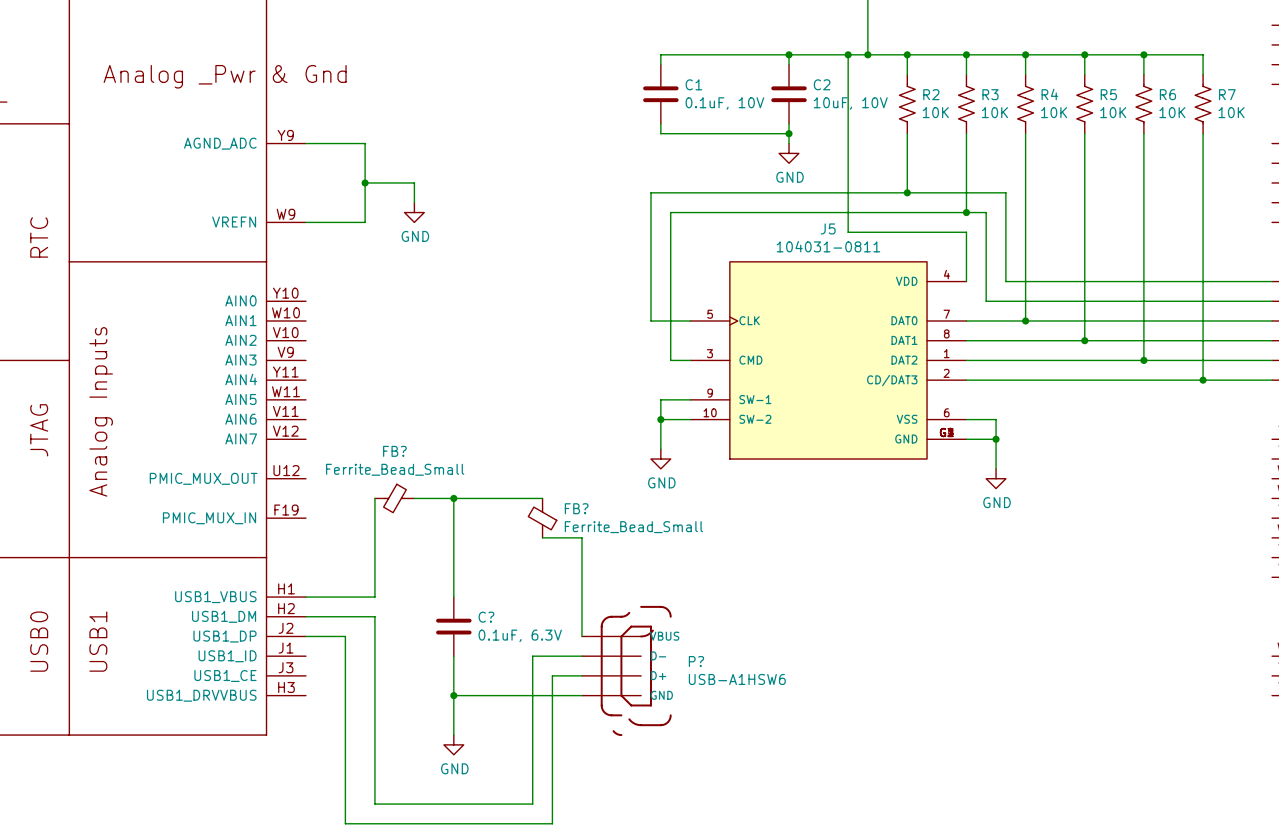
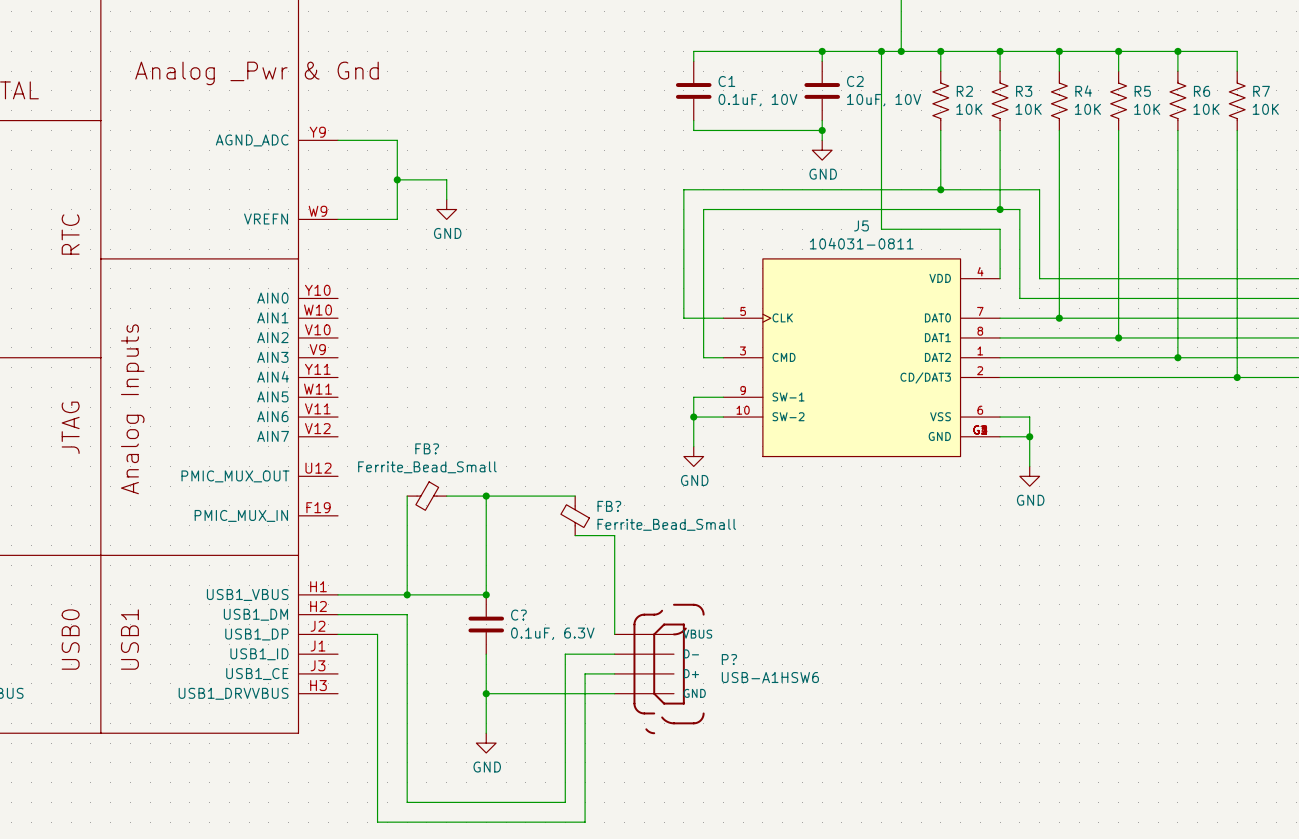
wire: none -> (407, 594) (486, 594)
junction: none -> (407, 594)
junction: none -> (486, 594)

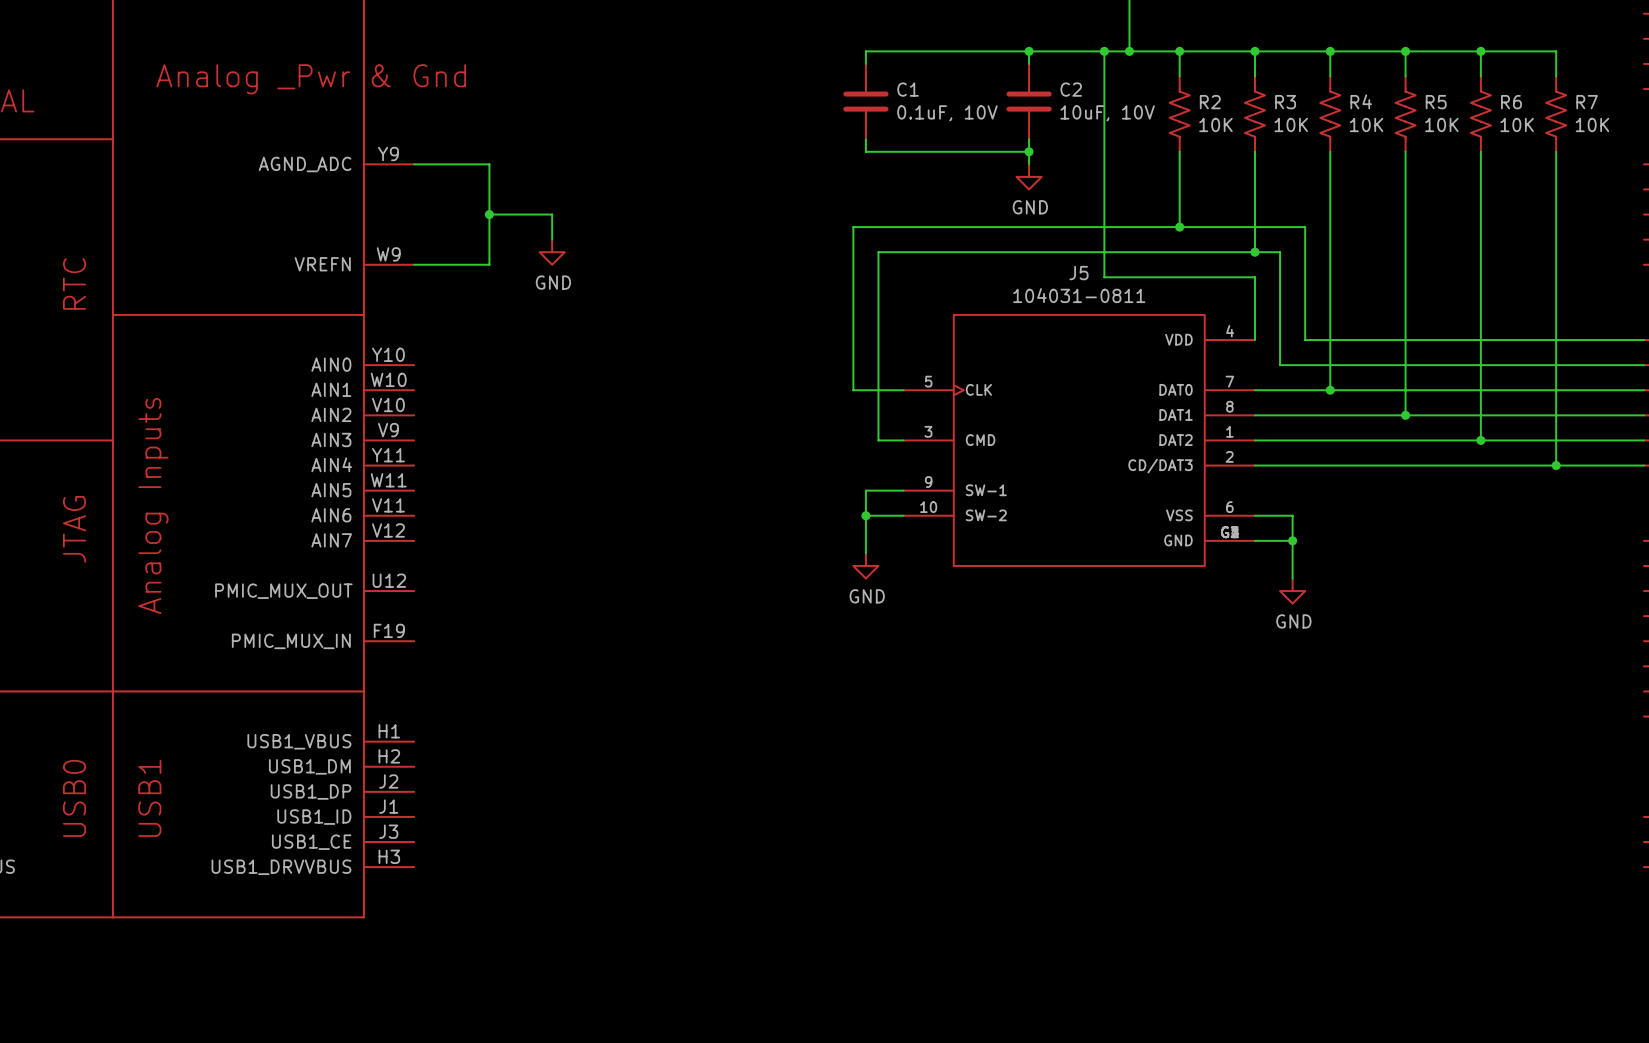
wire: (407, 496) (407, 594) -> none
FB?: Ferrite_Bead_Small (426, 496) -> none
wire: (446, 496) (575, 496) -> none
wire: (486, 496) (486, 594) (338, 594) -> none
junction: (486, 496) -> none
FB?: Ferrite_Bead_Small (575, 515) -> none
wire: (575, 535) (614, 535) (614, 634) -> none
junction: (407, 594) -> none
junction: (486, 594) -> none
wire: (338, 614) (407, 614) (407, 802) (565, 802) (565, 654) (614, 654) -> none
C?: 0.1uF, 6.3V (486, 624) -> none
wire: (338, 634) (377, 634) (377, 822) (585, 822) (585, 673) (614, 673) -> none
wire: (486, 654) (486, 733) -> none
P?: USB-A1HSW6 (659, 668) -> none
wire: (486, 693) (614, 693) -> none
junction: (486, 693) -> none
power symbol: GND (486, 743) -> none

